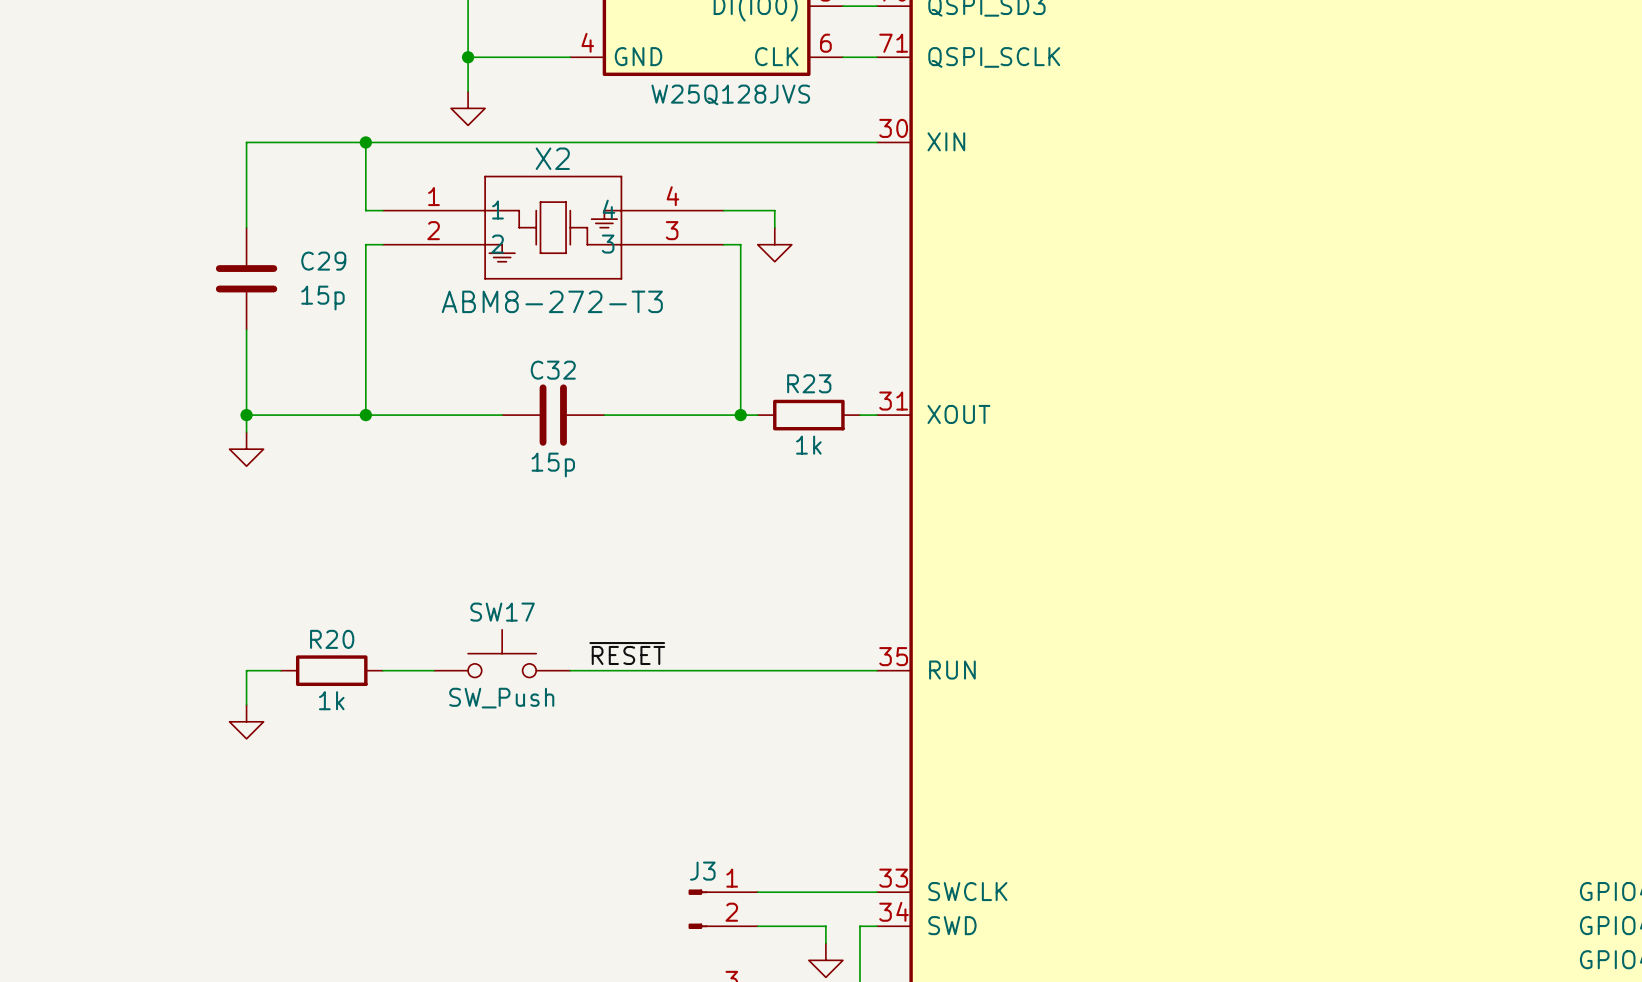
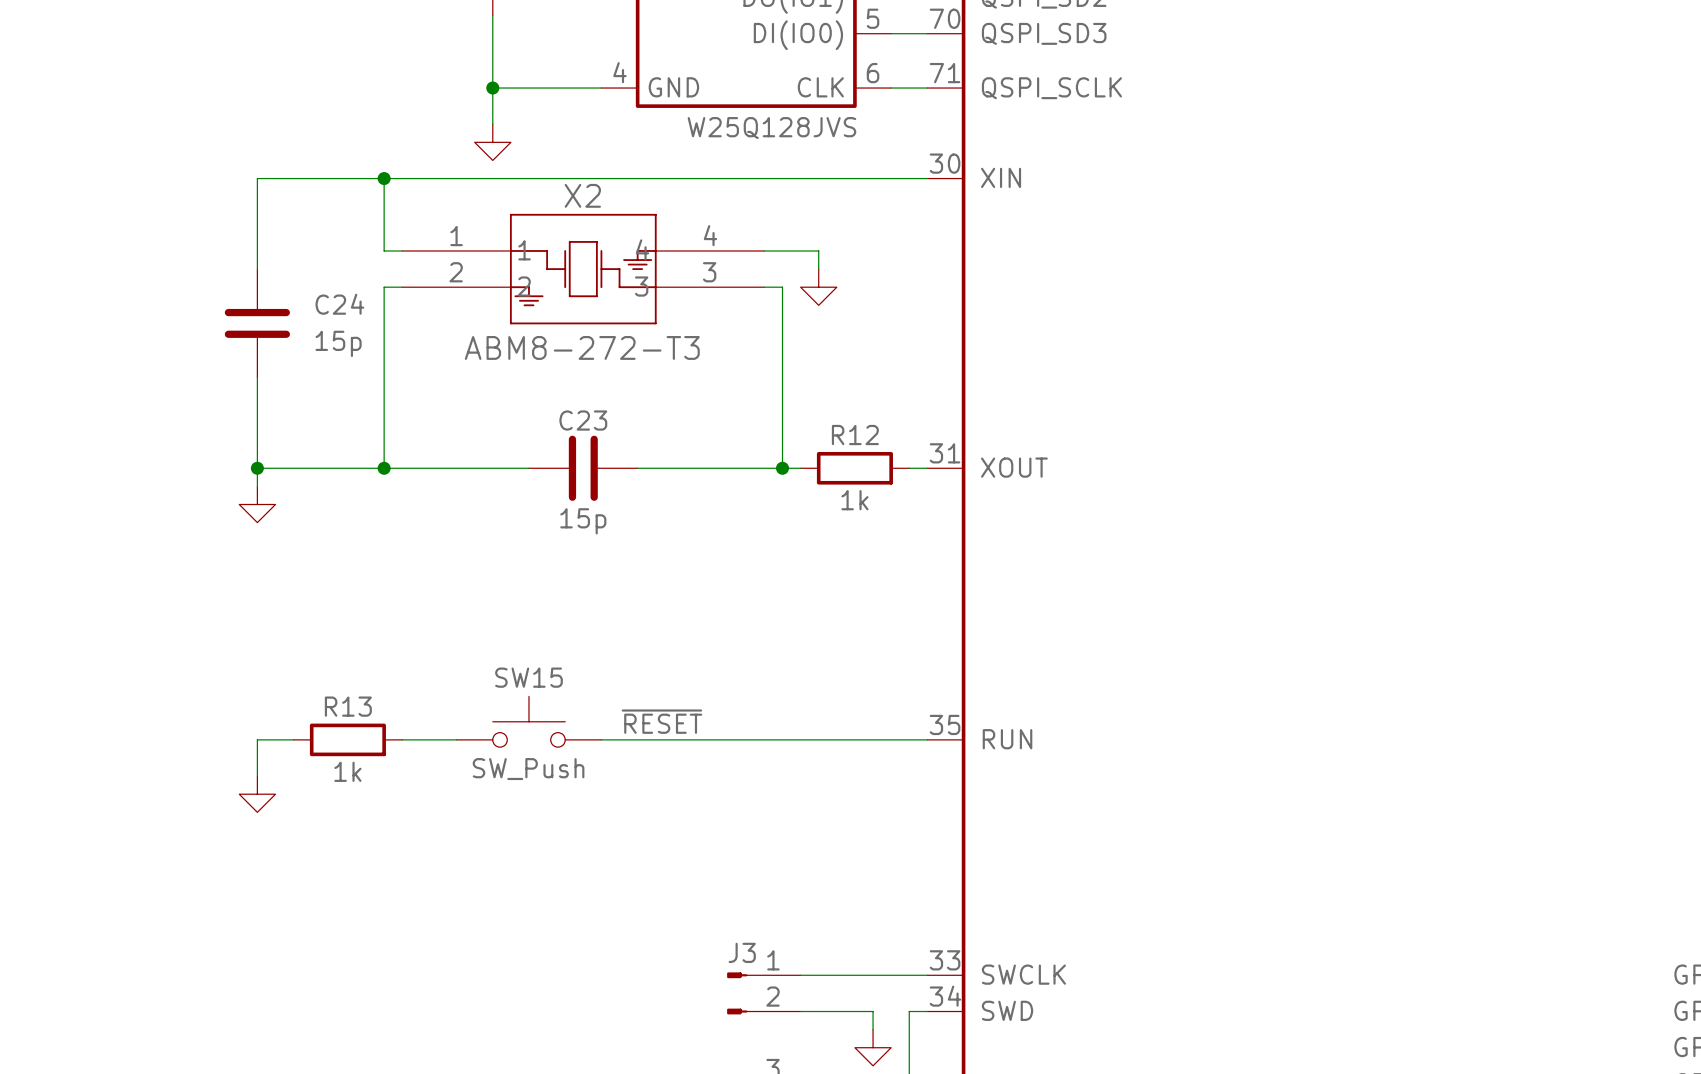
C29 name: C29 (323, 261) -> C24 (339, 304)
C32 name: C32 (553, 370) -> C23 (583, 420)
R23 name: R23 (809, 383) -> R12 (855, 435)
SW17 name: SW17 (502, 612) -> SW15 (529, 677)
R20 name: R20 (332, 639) -> R13 (348, 706)

